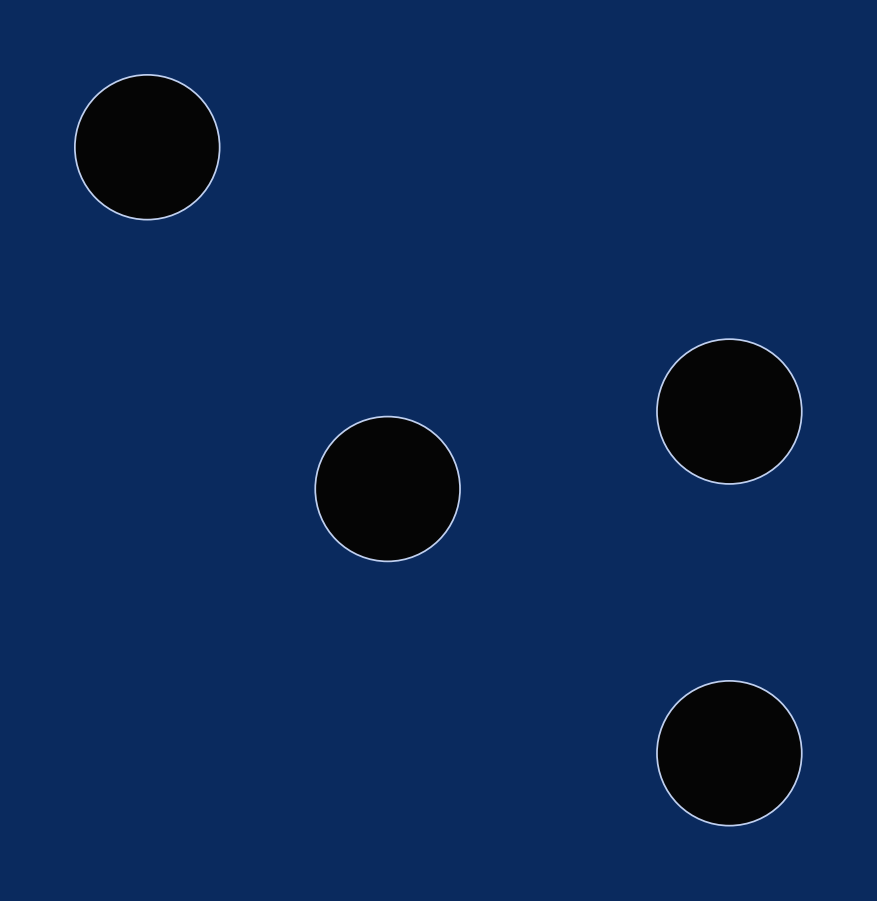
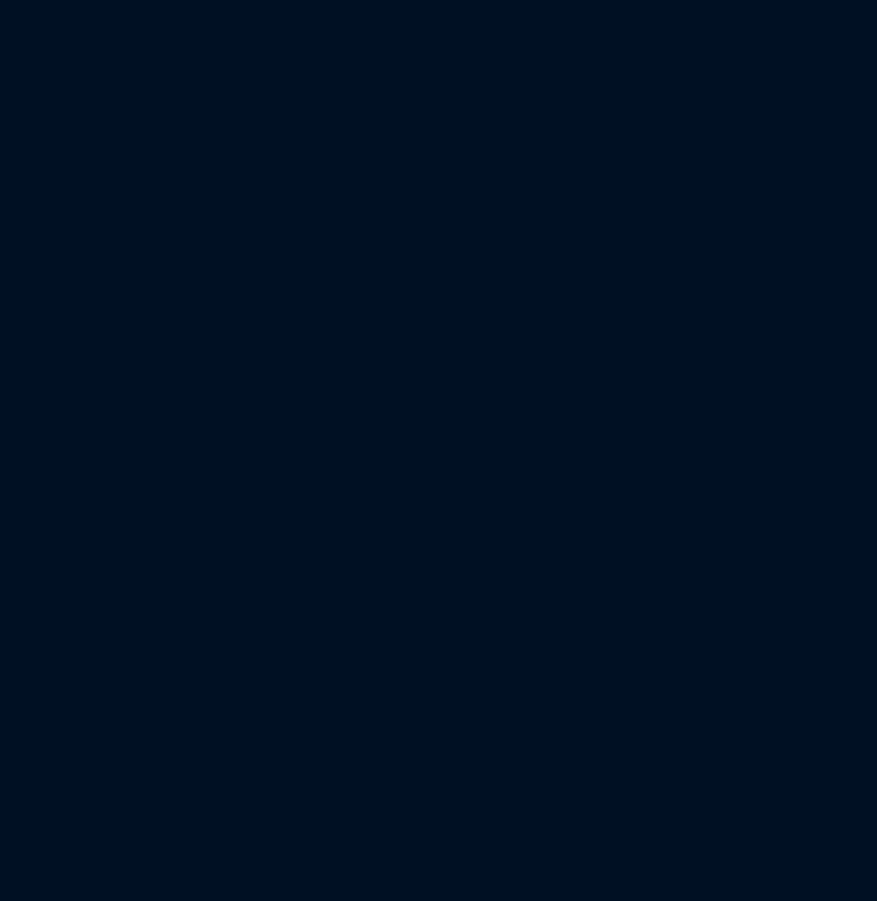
part: (147, 147) -> none
part: (729, 411) -> none
part: (387, 488) -> none
part: (729, 753) -> none

